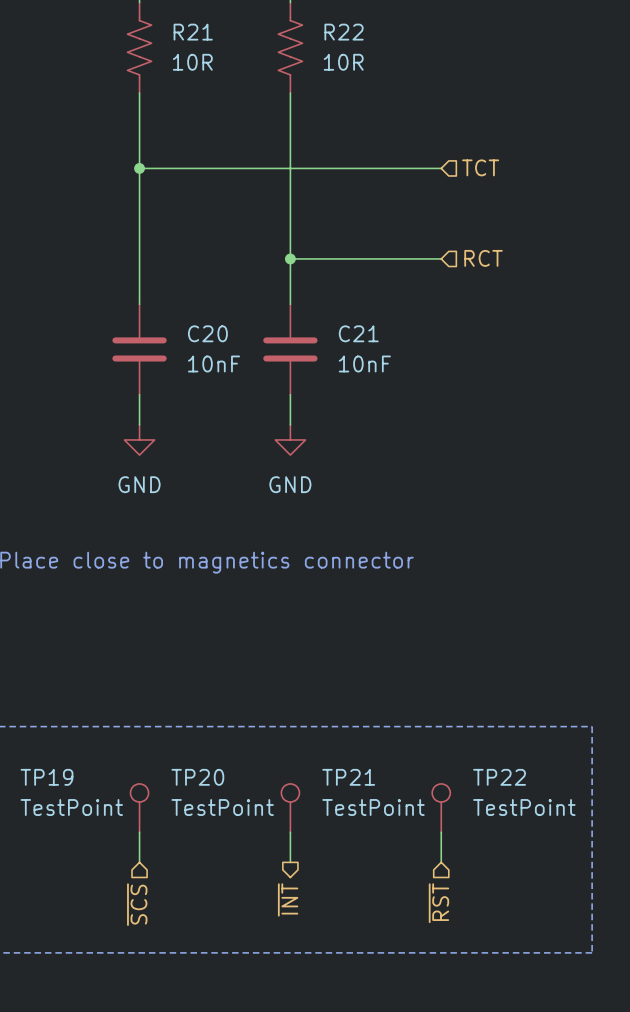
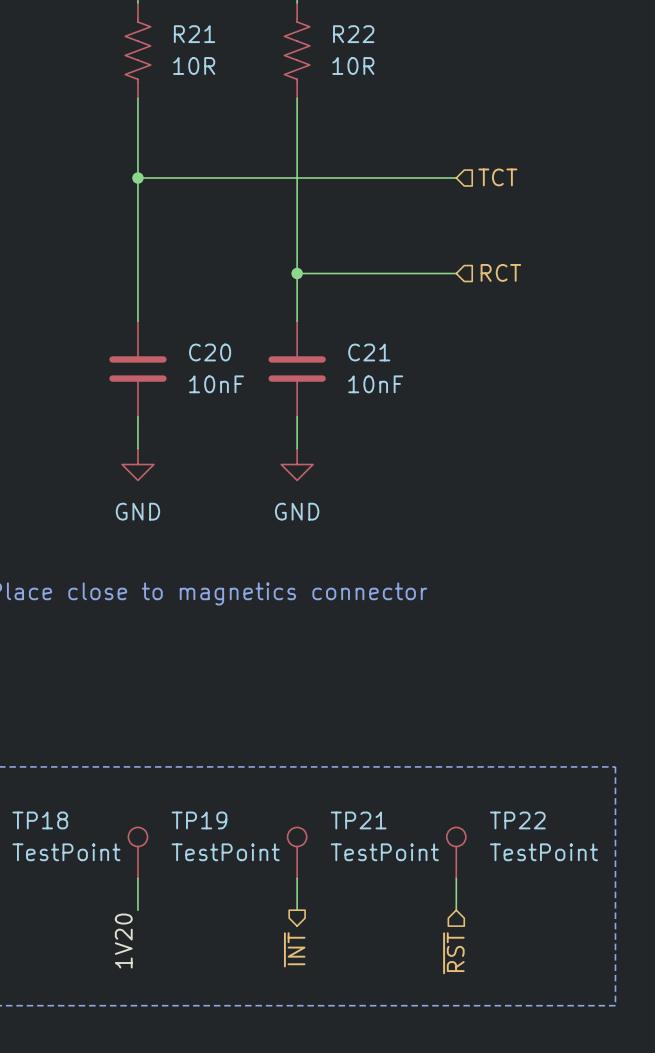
TP19 name: TP19 (46, 777) -> TP18 (40, 820)
TP20 name: TP20 (197, 777) -> TP19 (199, 820)
label: none -> 1V20 (123, 941)
hierarchical label: ~{SCS} (137, 904) -> none

